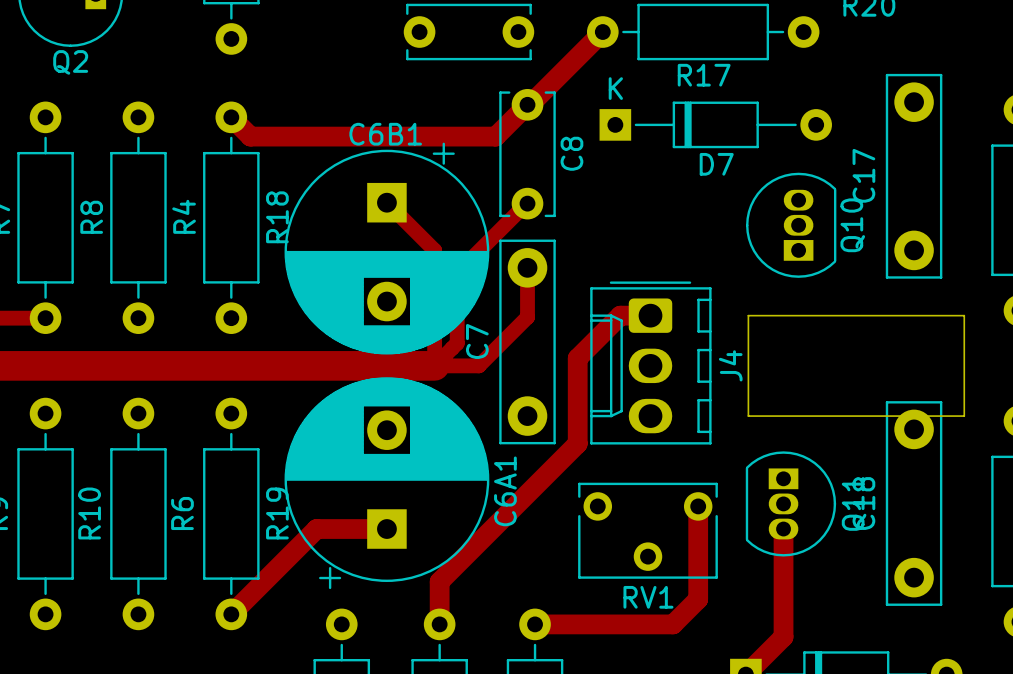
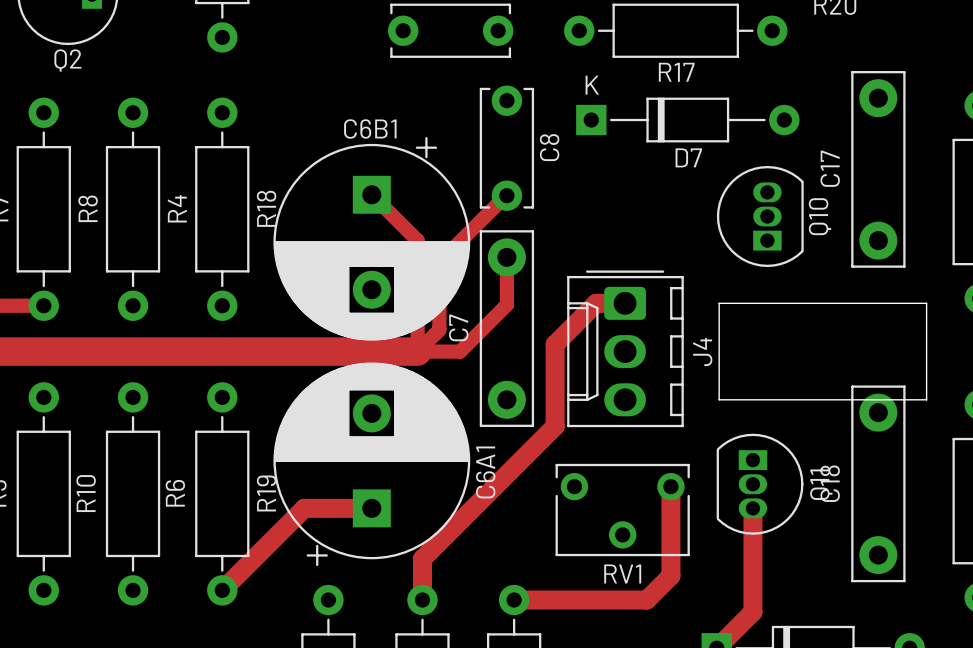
track: (602, 32) (530, 104) -> none
track: (527, 104) (495, 136) (250, 136) (231, 117) -> none

